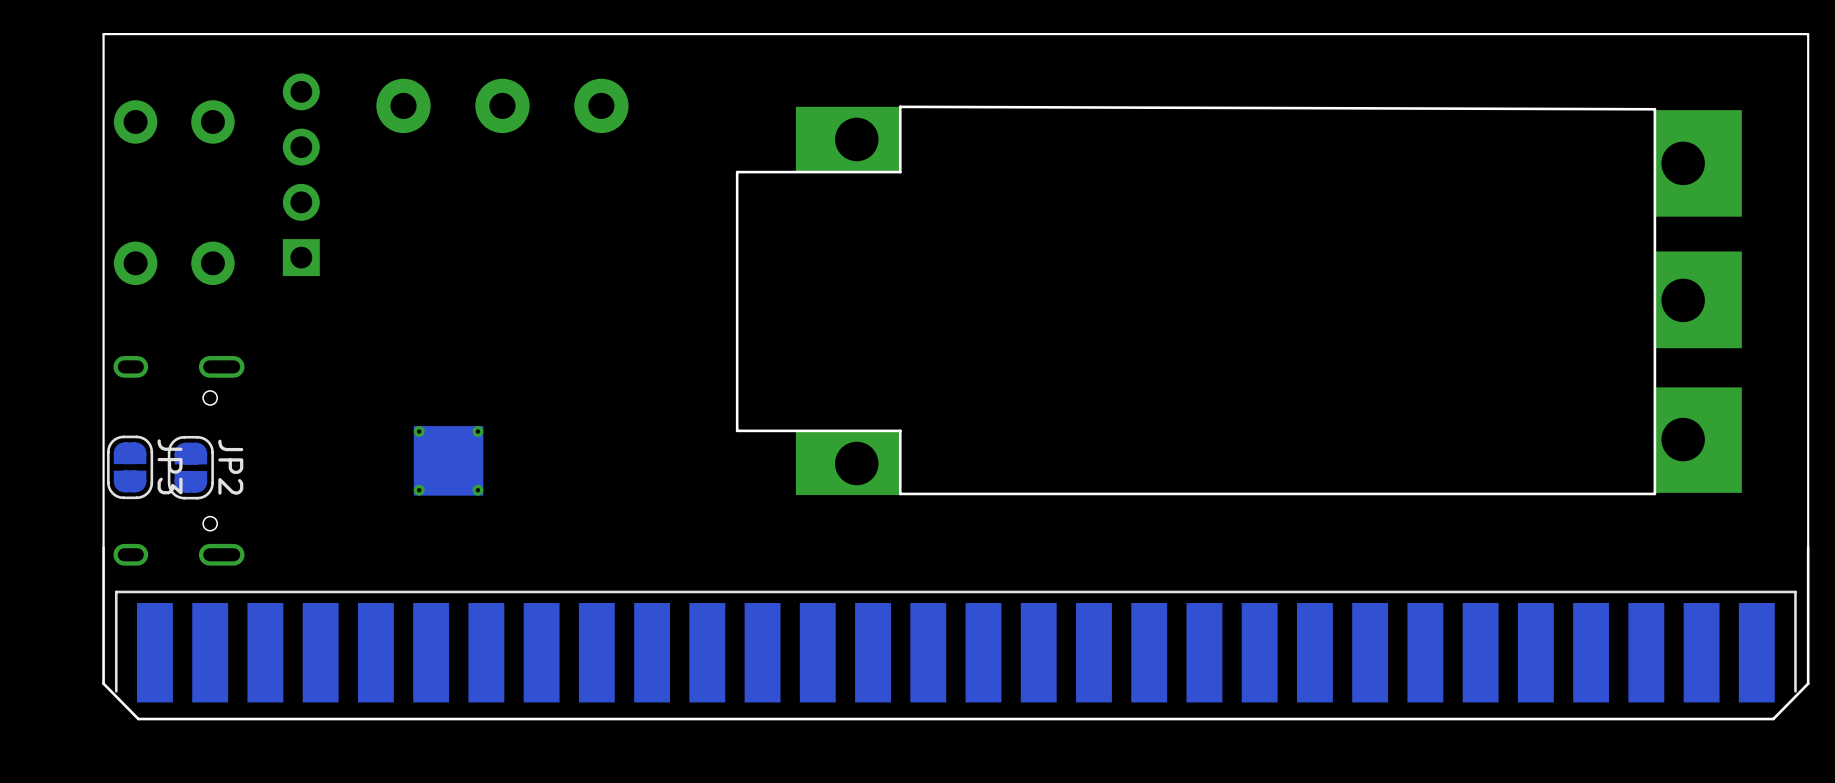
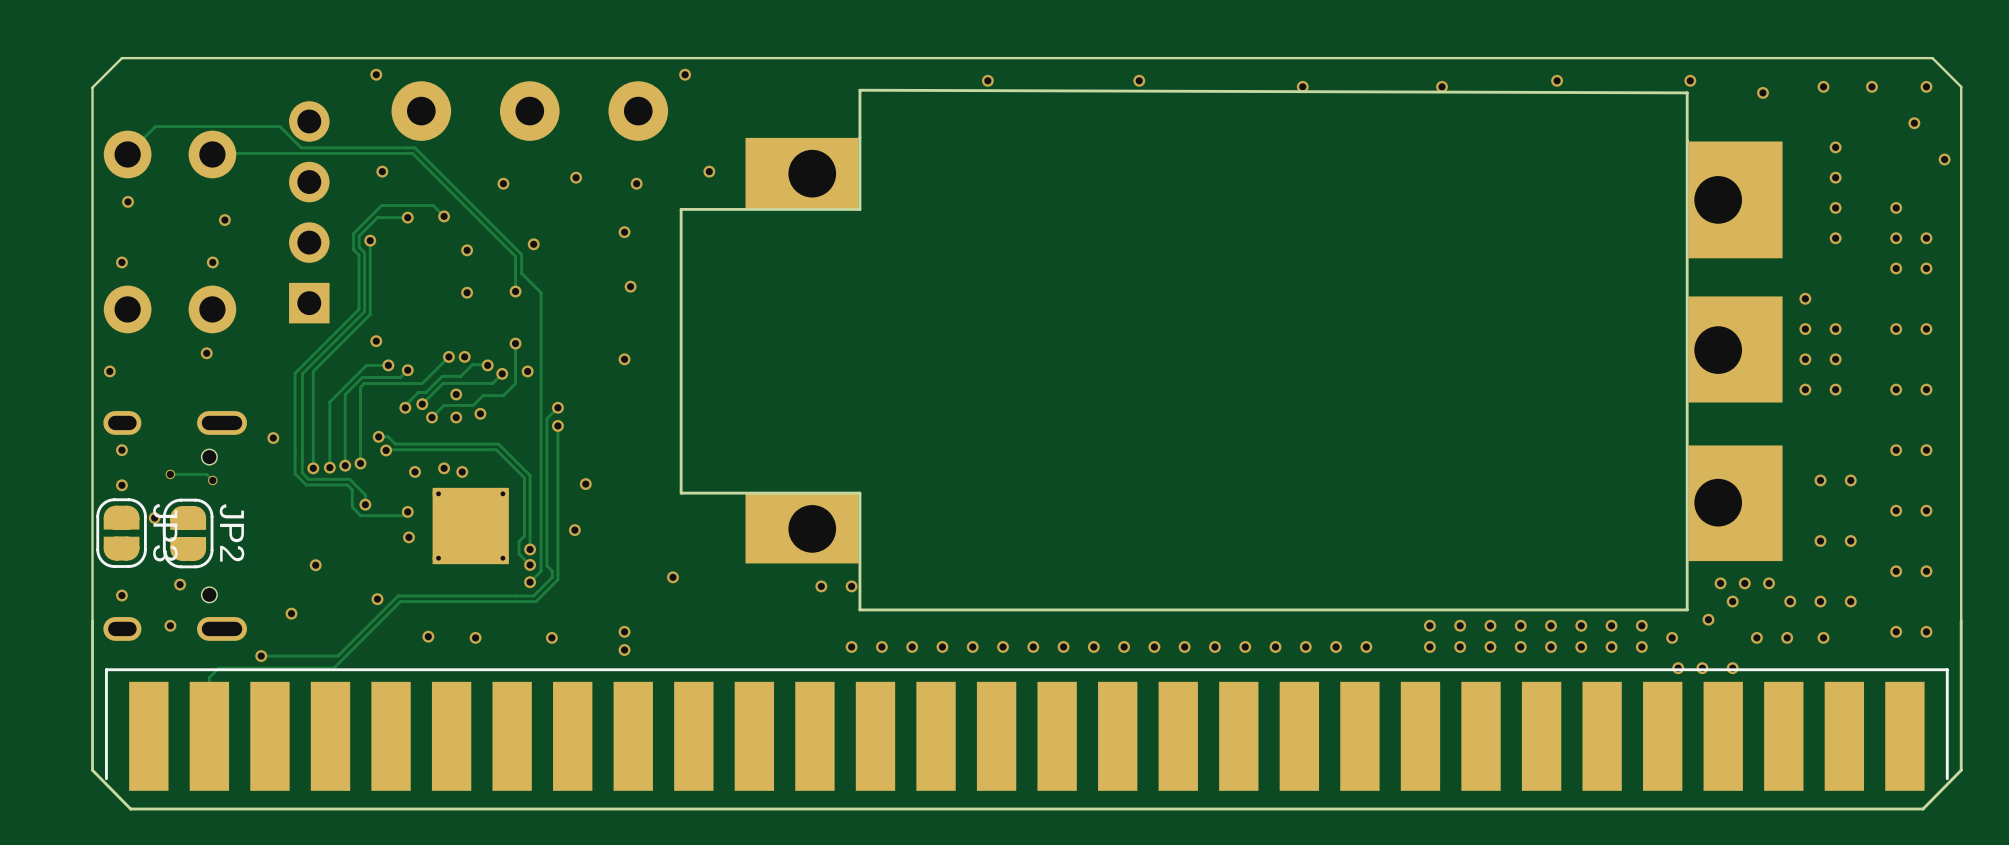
board edge: (130, 34) (103, 34) (103, 60) -> (121, 58) (92, 87)
board edge: (1781, 34) (1808, 34) (1808, 60) -> (1932, 58) (1961, 86)
via: none -> (376, 74)
via: none -> (685, 74)
via: none -> (987, 80)
via: none -> (1139, 80)
via: none -> (1557, 80)
via: none -> (1690, 80)
via: none -> (1302, 86)
via: none -> (1442, 86)
via: none -> (1823, 86)
via: none -> (1871, 86)
via: none -> (1926, 86)
via: none -> (1762, 92)
via: none -> (1914, 123)
part position: (403, 105) -> (421, 111)
part position: (502, 105) -> (529, 111)
part position: (601, 105) -> (638, 111)
via: none -> (1835, 147)
track: none -> (127, 154) (155, 126) (279, 126) (301, 147) (414, 147) (521, 254) (521, 273) (541, 292) (541, 571) (530, 582)
track: none -> (212, 154) (412, 153) (515, 256) (515, 291)
via: none -> (1944, 159)
via: none -> (382, 171)
via: none -> (709, 171)
via: none -> (576, 177)
via: none -> (1835, 177)
via: none -> (503, 183)
via: none -> (636, 183)
via: none -> (128, 201)
via: none -> (1835, 207)
via: none -> (1896, 207)
track: none -> (444, 216) (433, 205) (381, 205) (353, 233) (353, 249) (359, 255) (359, 309) (295, 373) (295, 473) (306, 484) (347, 484) (352, 489) (352, 507) (360, 515) (404, 515) (407, 511)
via: none -> (444, 216)
track: none -> (407, 217) (377, 217) (359, 235) (359, 247) (364, 252) (364, 311) (302, 373) (302, 461)
via: none -> (407, 217)
via: none -> (224, 220)
via: none -> (624, 232)
via: none -> (1835, 238)
via: none -> (1896, 238)
via: none -> (1926, 238)
track: none -> (370, 240) (370, 314) (313, 371) (313, 468)
via: none -> (370, 240)
via: none -> (533, 244)
via: none -> (467, 250)
via: none -> (121, 262)
via: none -> (212, 262)
via: none -> (1896, 268)
via: none -> (1926, 268)
via: none -> (630, 286)
via: none -> (515, 291)
via: none -> (467, 292)
via: none -> (1805, 298)
via: none -> (1805, 329)
via: none -> (1835, 329)
via: none -> (1896, 329)
via: none -> (1926, 329)
via: none -> (376, 341)
track: none -> (515, 343) (515, 383) (503, 395) (483, 395) (473, 405) (443, 405) (431, 417)
via: none -> (515, 343)
part: none -> (1231, 350)
part: (1238, 300) -> none
via: none -> (206, 353)
track: none -> (448, 356) (422, 383) (364, 383) (360, 387) (360, 463)
via: none -> (448, 356)
via: none -> (464, 356)
via: none -> (624, 359)
via: none -> (1805, 359)
via: none -> (1835, 359)
track: none -> (388, 365) (366, 365) (329, 402) (329, 467)
via: none -> (388, 365)
track: none -> (487, 365) (472, 364) (460, 376) (442, 376) (426, 392) (418, 392) (405, 407)
via: none -> (487, 365)
track: none -> (407, 370) (400, 377) (362, 377) (345, 394) (345, 465)
via: none -> (407, 370)
via: none -> (109, 371)
via: none -> (527, 371)
track: none -> (502, 373) (492, 383) (442, 383) (422, 404)
via: none -> (502, 373)
via: none -> (1805, 389)
via: none -> (1835, 389)
via: none -> (1896, 389)
via: none -> (1926, 389)
via: none -> (456, 394)
via: none -> (422, 404)
via: none -> (405, 407)
track: none -> (557, 407) (546, 418) (546, 565) (552, 571) (552, 577) (533, 595) (398, 595) (338, 656) (261, 656)
via: none -> (557, 407)
via: none -> (480, 413)
via: none -> (431, 417)
via: none -> (456, 417)
track: none -> (557, 425) (557, 579) (536, 601) (400, 601) (333, 668) (218, 668) (209, 677) (209, 736)
via: none -> (557, 425)
track: none -> (378, 436) (388, 436) (395, 444) (498, 444) (530, 475) (530, 549)
via: none -> (378, 436)
via: none -> (273, 438)
via: none -> (121, 450)
track: none -> (386, 450) (496, 449) (524, 477) (524, 536) (519, 541) (519, 554) (529, 564)
via: none -> (386, 450)
via: none -> (1896, 450)
via: none -> (1926, 450)
track: none -> (302, 461) (302, 473) (308, 479) (349, 479)
via: none -> (360, 463)
via: none -> (345, 465)
via: none -> (329, 467)
via: none -> (313, 468)
via: none -> (444, 468)
via: none -> (415, 471)
via: none -> (462, 471)
track: none -> (170, 474) (206, 474) (212, 480)
via: none -> (170, 474)
track: none -> (349, 479) (365, 494) (365, 504)
via: none -> (212, 480)
via: none -> (1820, 480)
via: none -> (1850, 480)
via: none -> (585, 484)
via: none -> (121, 485)
via: none -> (365, 504)
via: none -> (1896, 510)
via: none -> (1926, 510)
via: none -> (407, 511)
via: none -> (154, 517)
via: none -> (574, 530)
via: none -> (408, 537)
via: none -> (1820, 541)
via: none -> (1850, 541)
via: none -> (530, 549)
via: none -> (315, 565)
via: none -> (530, 564)
via: none -> (1896, 571)
via: none -> (1926, 571)
via: none -> (672, 577)
via: none -> (530, 582)
via: none -> (1720, 583)
via: none -> (1744, 583)
via: none -> (1769, 583)
via: none -> (180, 584)
via: none -> (821, 586)
via: none -> (851, 586)
via: none -> (121, 595)
via: none -> (377, 599)
via: none -> (1732, 601)
via: none -> (1790, 601)
via: none -> (1820, 601)
via: none -> (1850, 601)
via: none -> (291, 613)
via: none -> (1708, 619)
via: none -> (170, 625)
via: none -> (1429, 625)
via: none -> (1460, 625)
via: none -> (1490, 625)
via: none -> (1520, 625)
via: none -> (1551, 625)
via: none -> (1581, 625)
via: none -> (1611, 625)
via: none -> (1641, 625)
via: none -> (624, 631)
via: none -> (1896, 631)
via: none -> (1926, 631)
via: none -> (428, 636)
via: none -> (475, 637)
via: none -> (551, 637)
via: none -> (1672, 637)
via: none -> (1756, 637)
via: none -> (1787, 637)
via: none -> (1823, 637)
via: none -> (851, 646)
via: none -> (881, 646)
via: none -> (912, 646)
via: none -> (942, 646)
via: none -> (972, 646)
via: none -> (1003, 646)
via: none -> (1033, 646)
via: none -> (1063, 646)
via: none -> (1093, 646)
via: none -> (1124, 646)
via: none -> (1154, 646)
via: none -> (1184, 646)
via: none -> (1214, 646)
via: none -> (1245, 646)
via: none -> (1275, 646)
via: none -> (1305, 646)
via: none -> (1336, 646)
via: none -> (1366, 646)
via: none -> (1429, 646)
via: none -> (1460, 646)
via: none -> (1490, 646)
via: none -> (1520, 646)
via: none -> (1551, 646)
via: none -> (1581, 646)
via: none -> (1611, 646)
via: none -> (1641, 646)
via: none -> (624, 649)
via: none -> (261, 656)
via: none -> (1678, 668)
via: none -> (1702, 668)
via: none -> (1732, 668)

